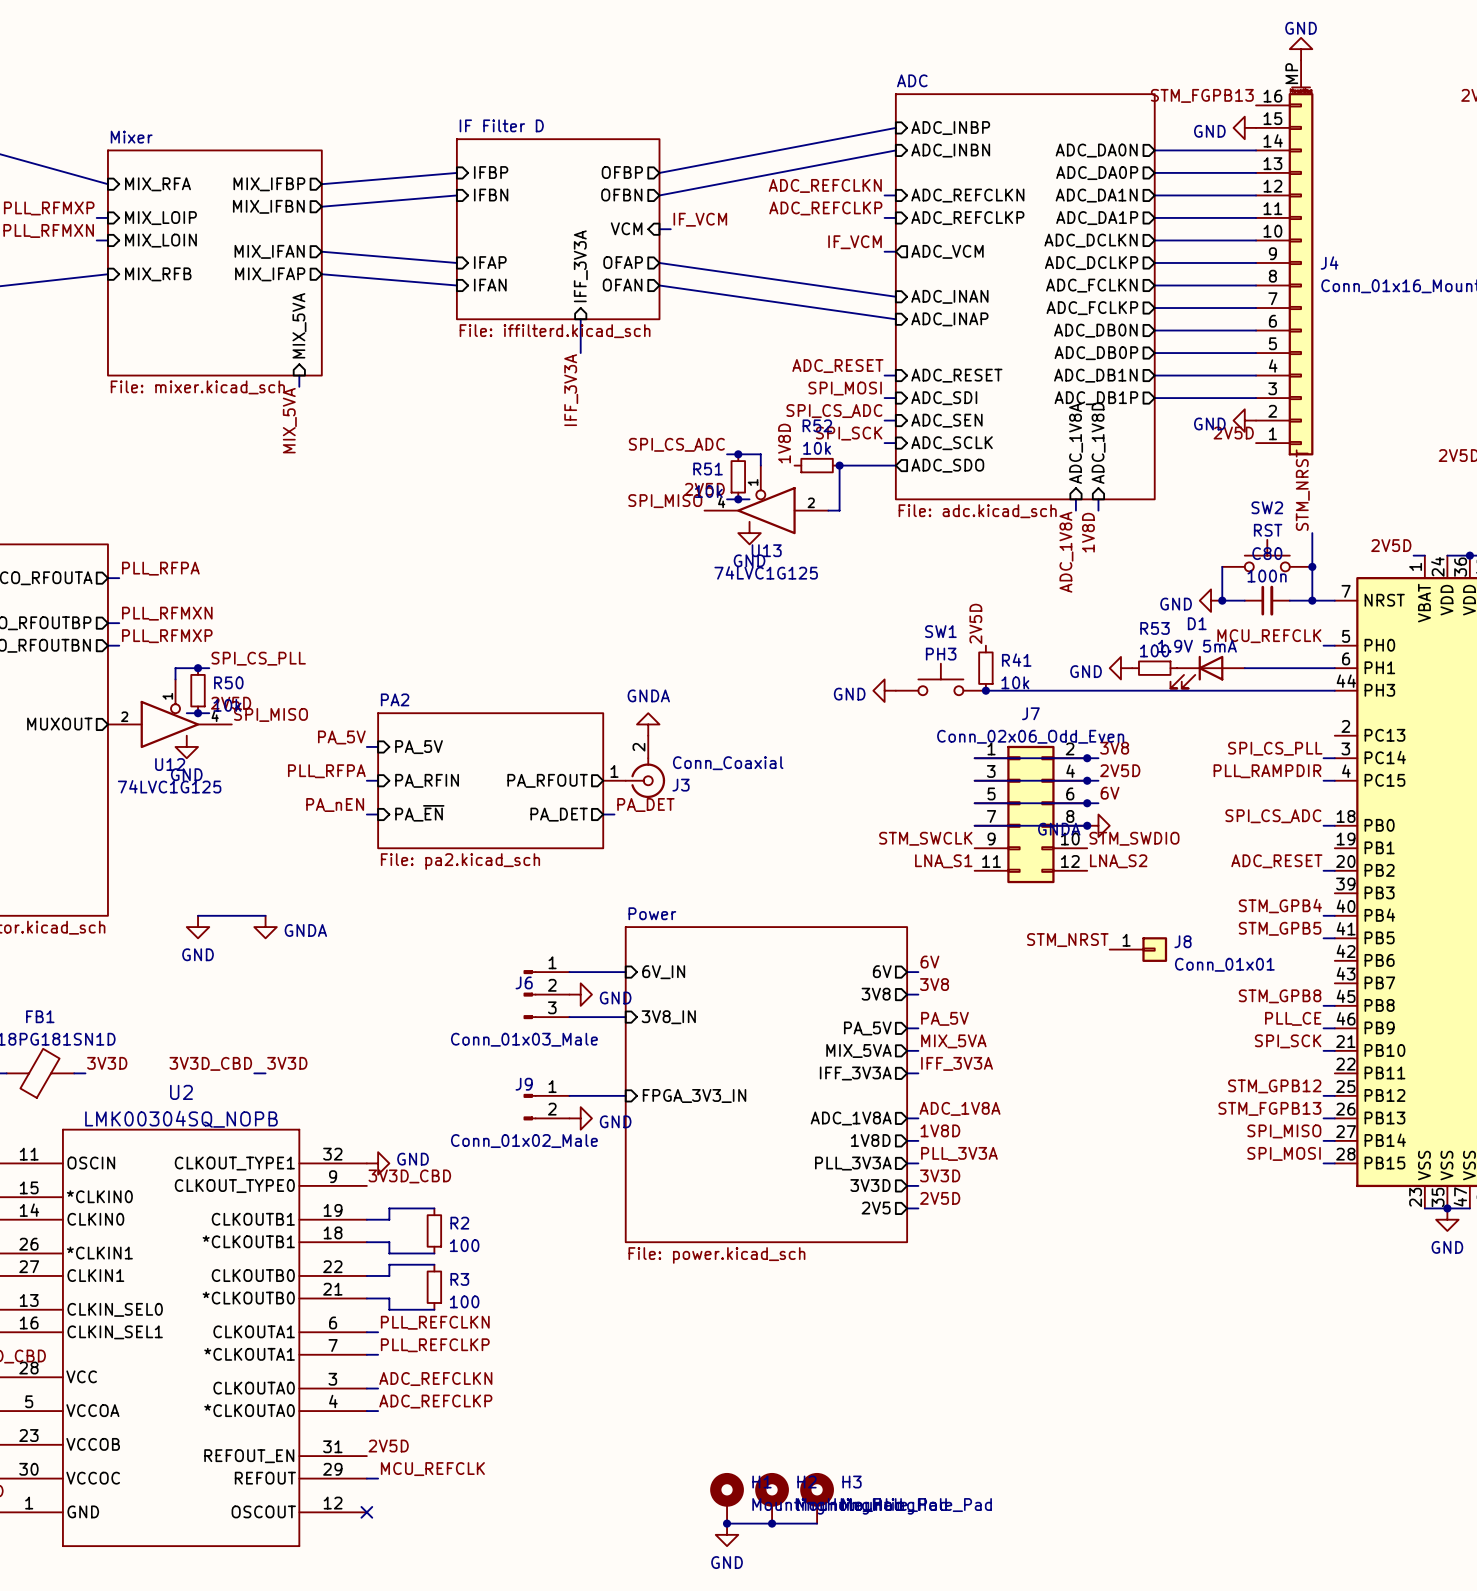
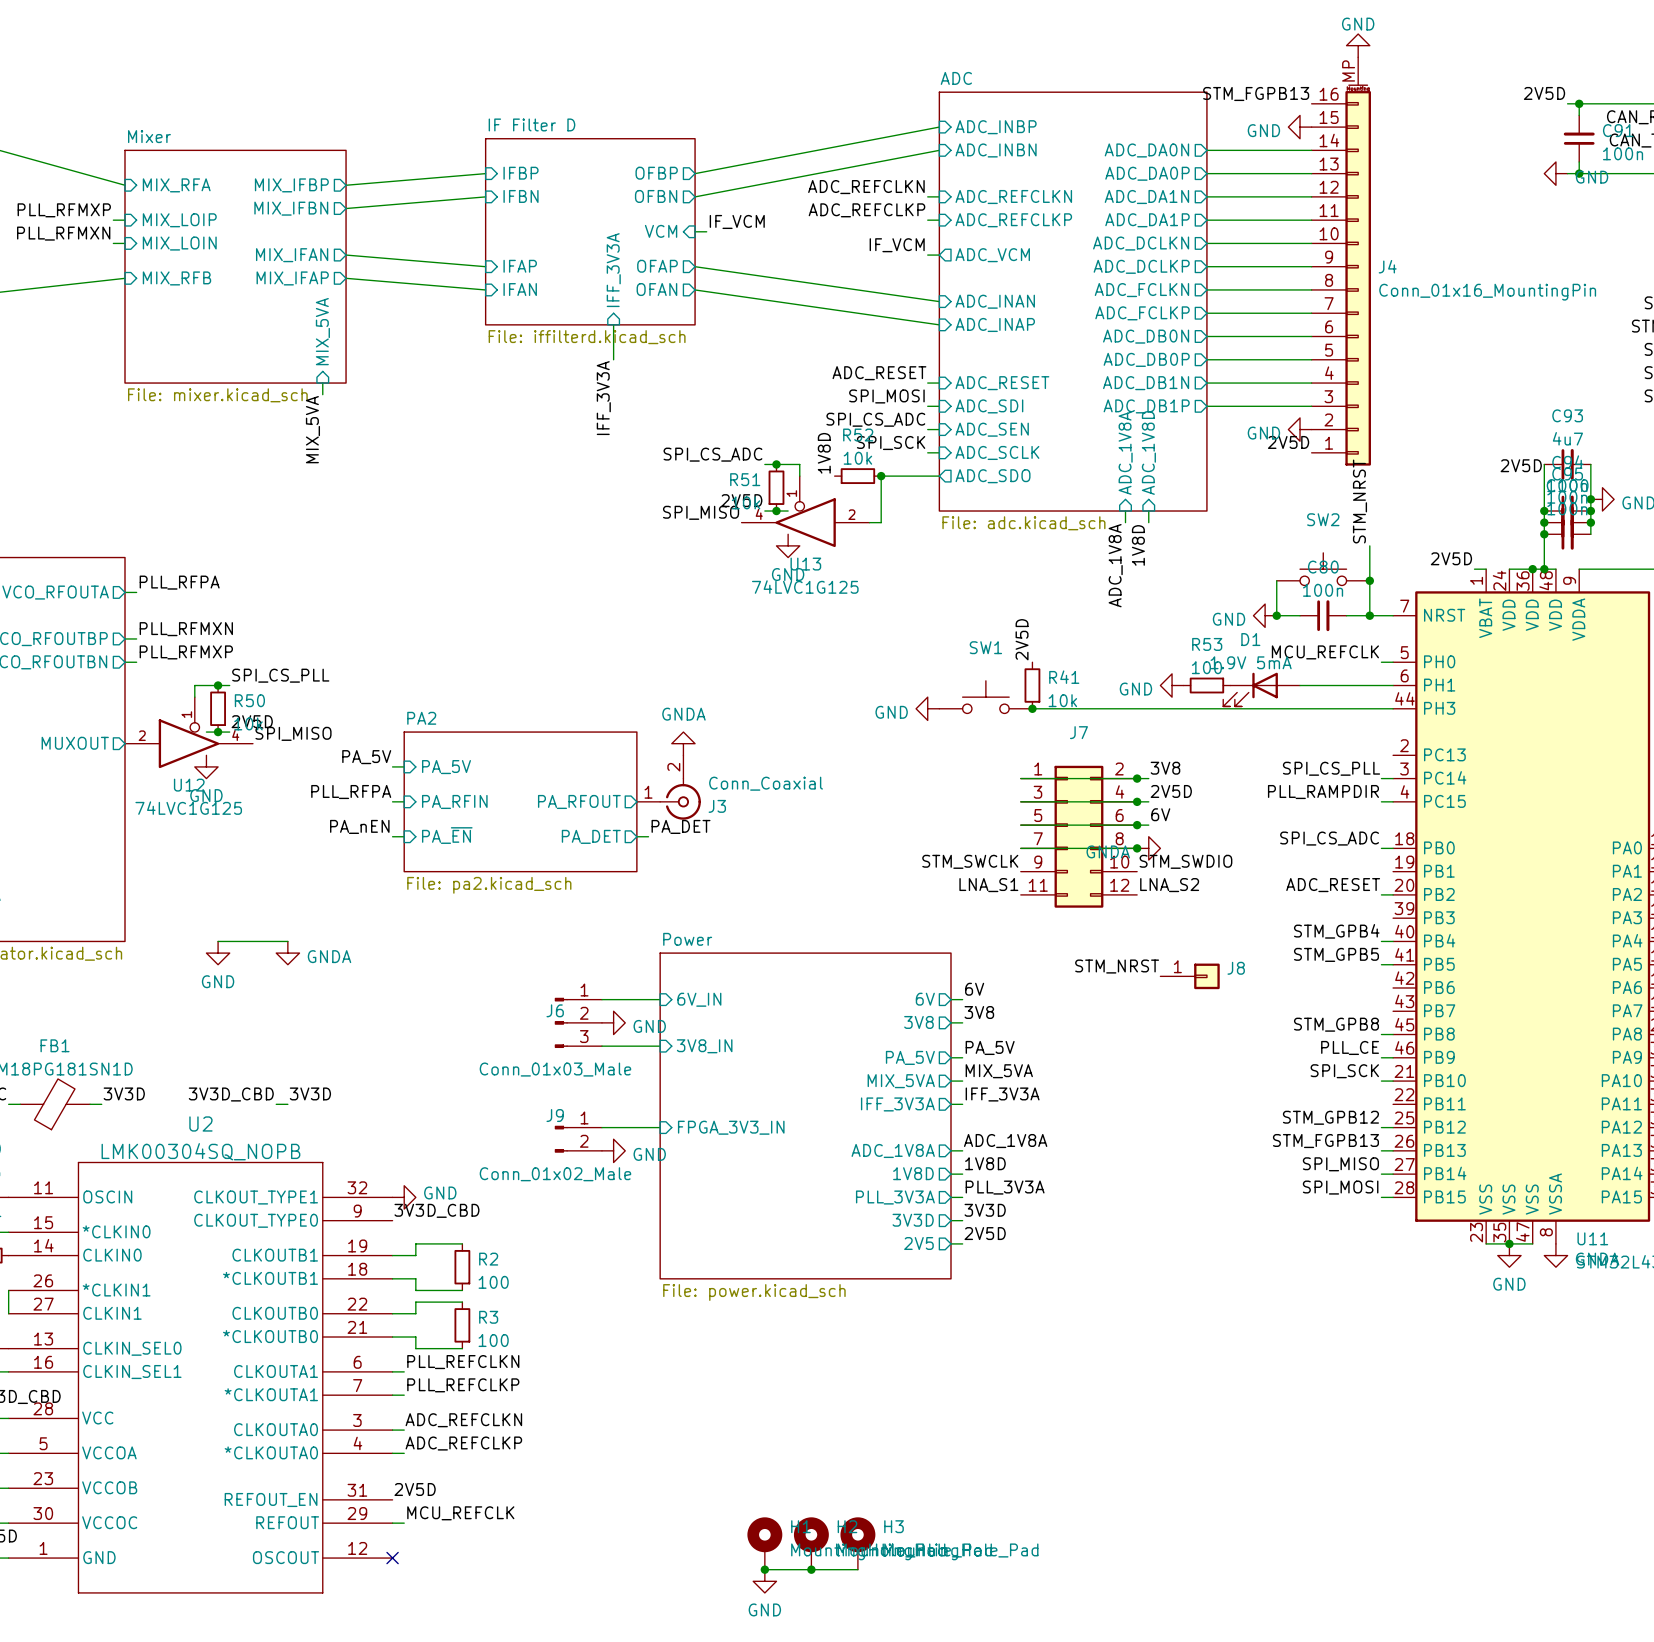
SW2 value: RST (1268, 530) -> none
SW1 value: PH3 (941, 654) -> none
J7 value: Conn_02x06_Odd_Even (1030, 736) -> none
J8 value: Conn_01x01 (1224, 964) -> none

